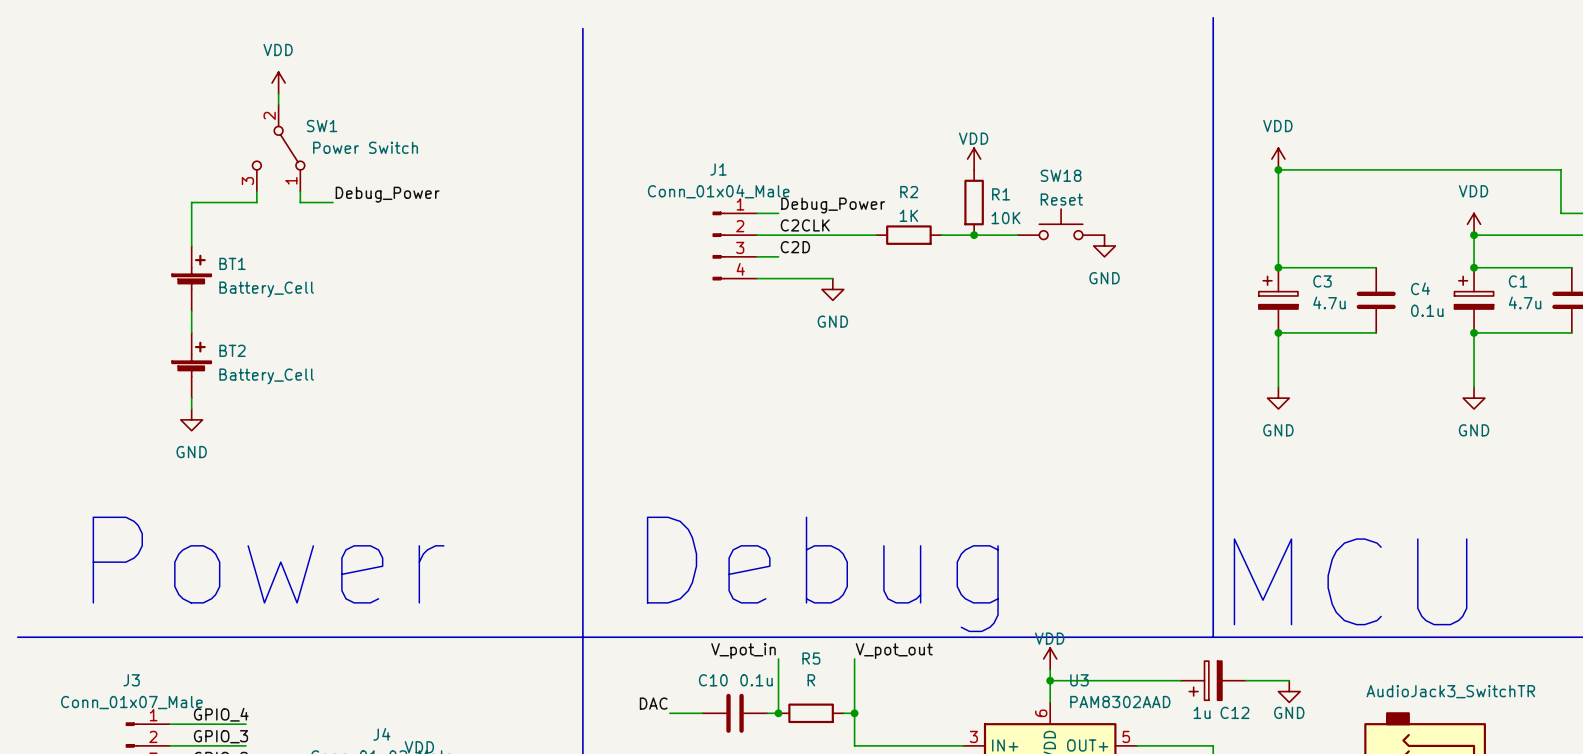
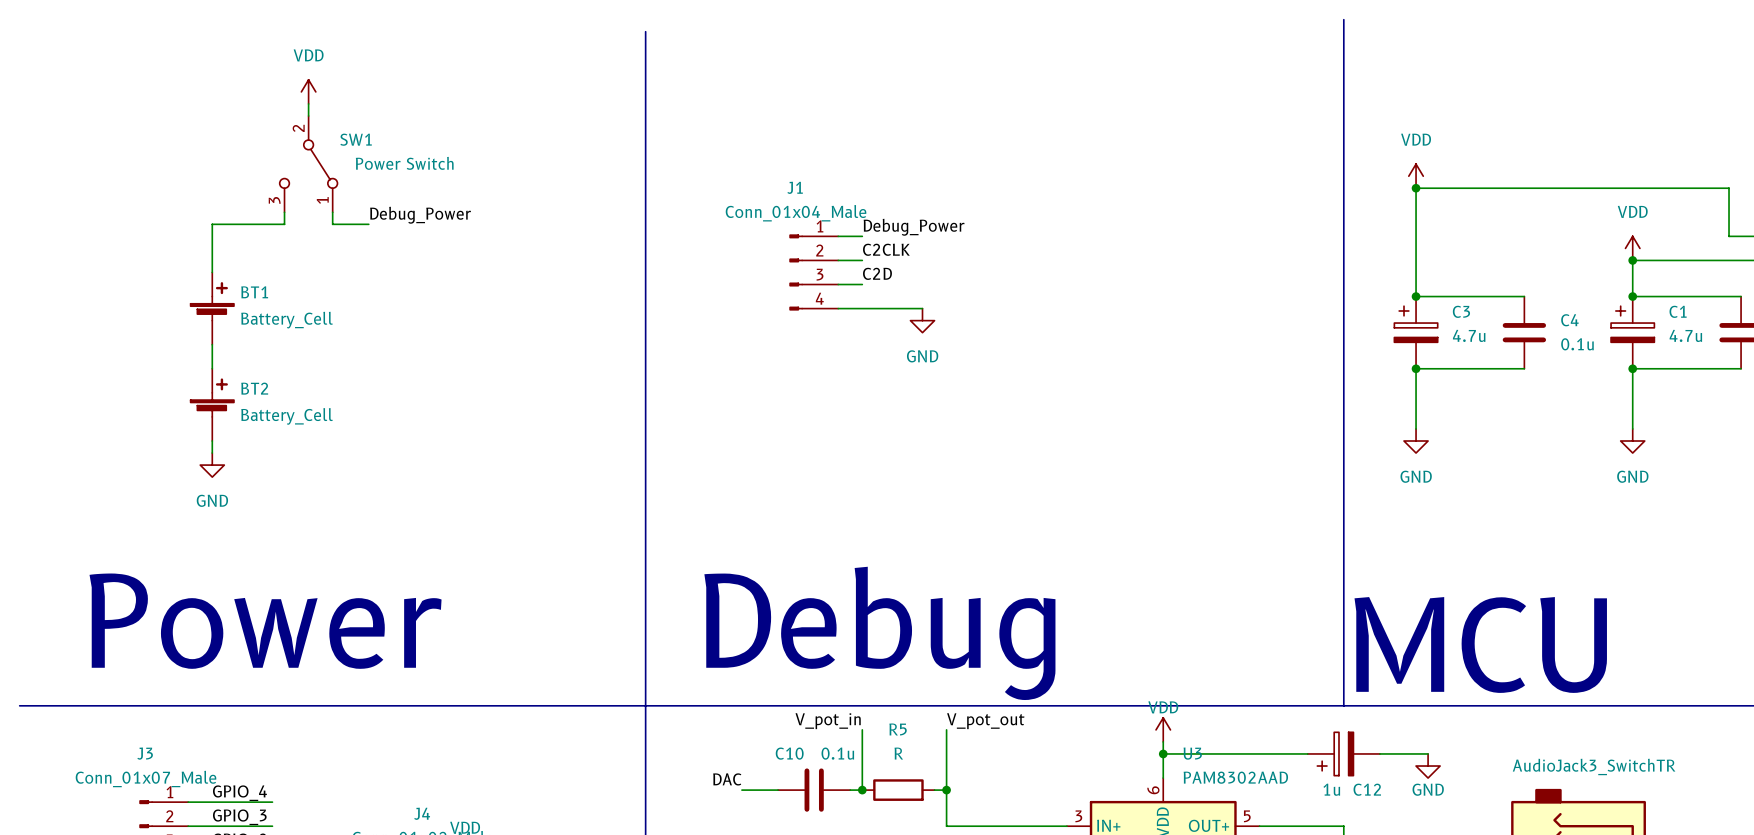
power symbol: VDD (974, 159) -> none
R1: 10K (974, 202) -> none
SW18: Reset (1061, 224) -> none
wire: (778, 235) (876, 235) -> none
R2: 1K (908, 235) -> none
wire: (941, 235) (1017, 235) -> none
junction: (974, 235) -> none
power symbol: GND (1104, 245) -> none

